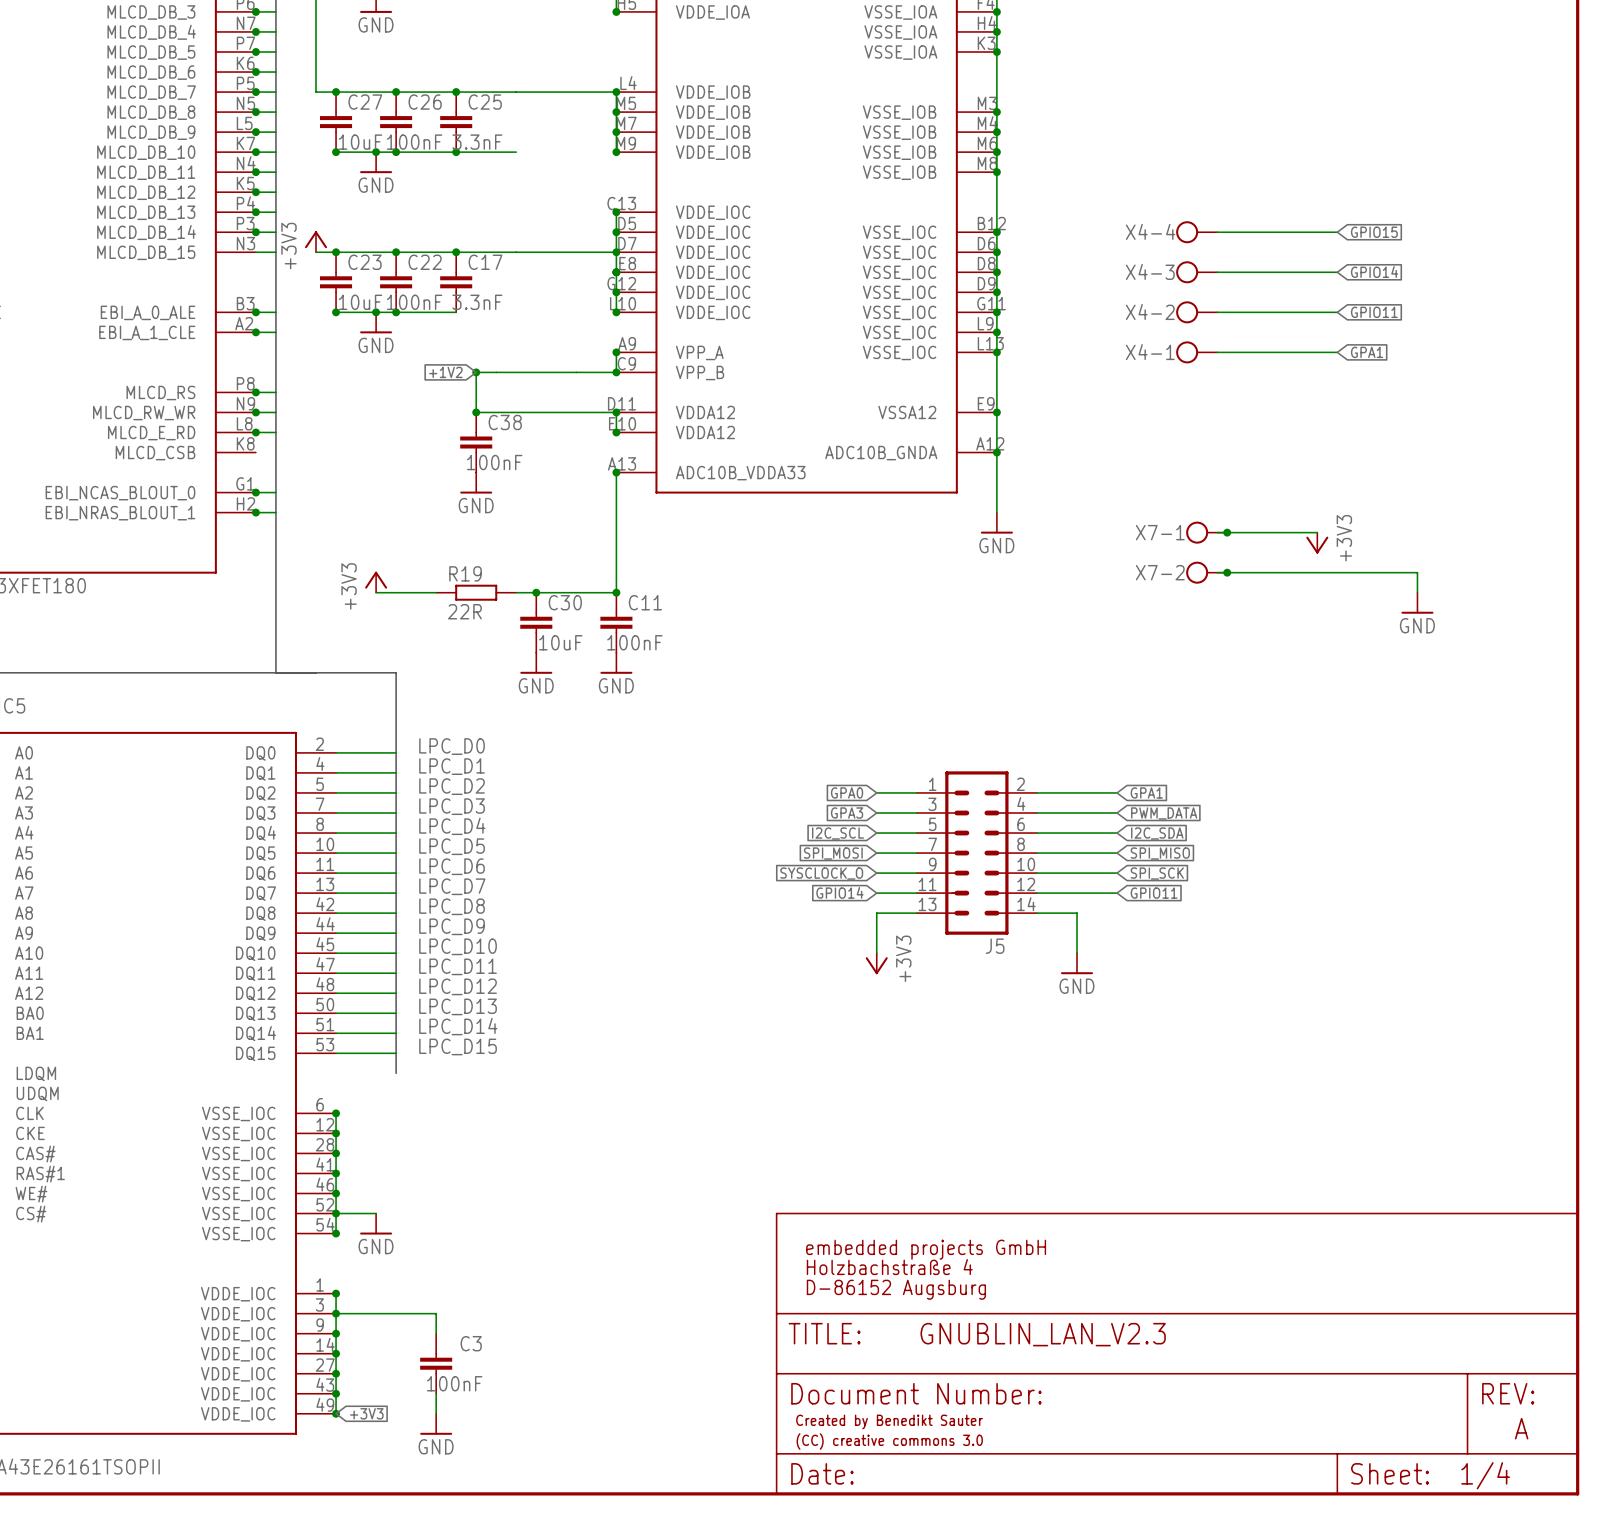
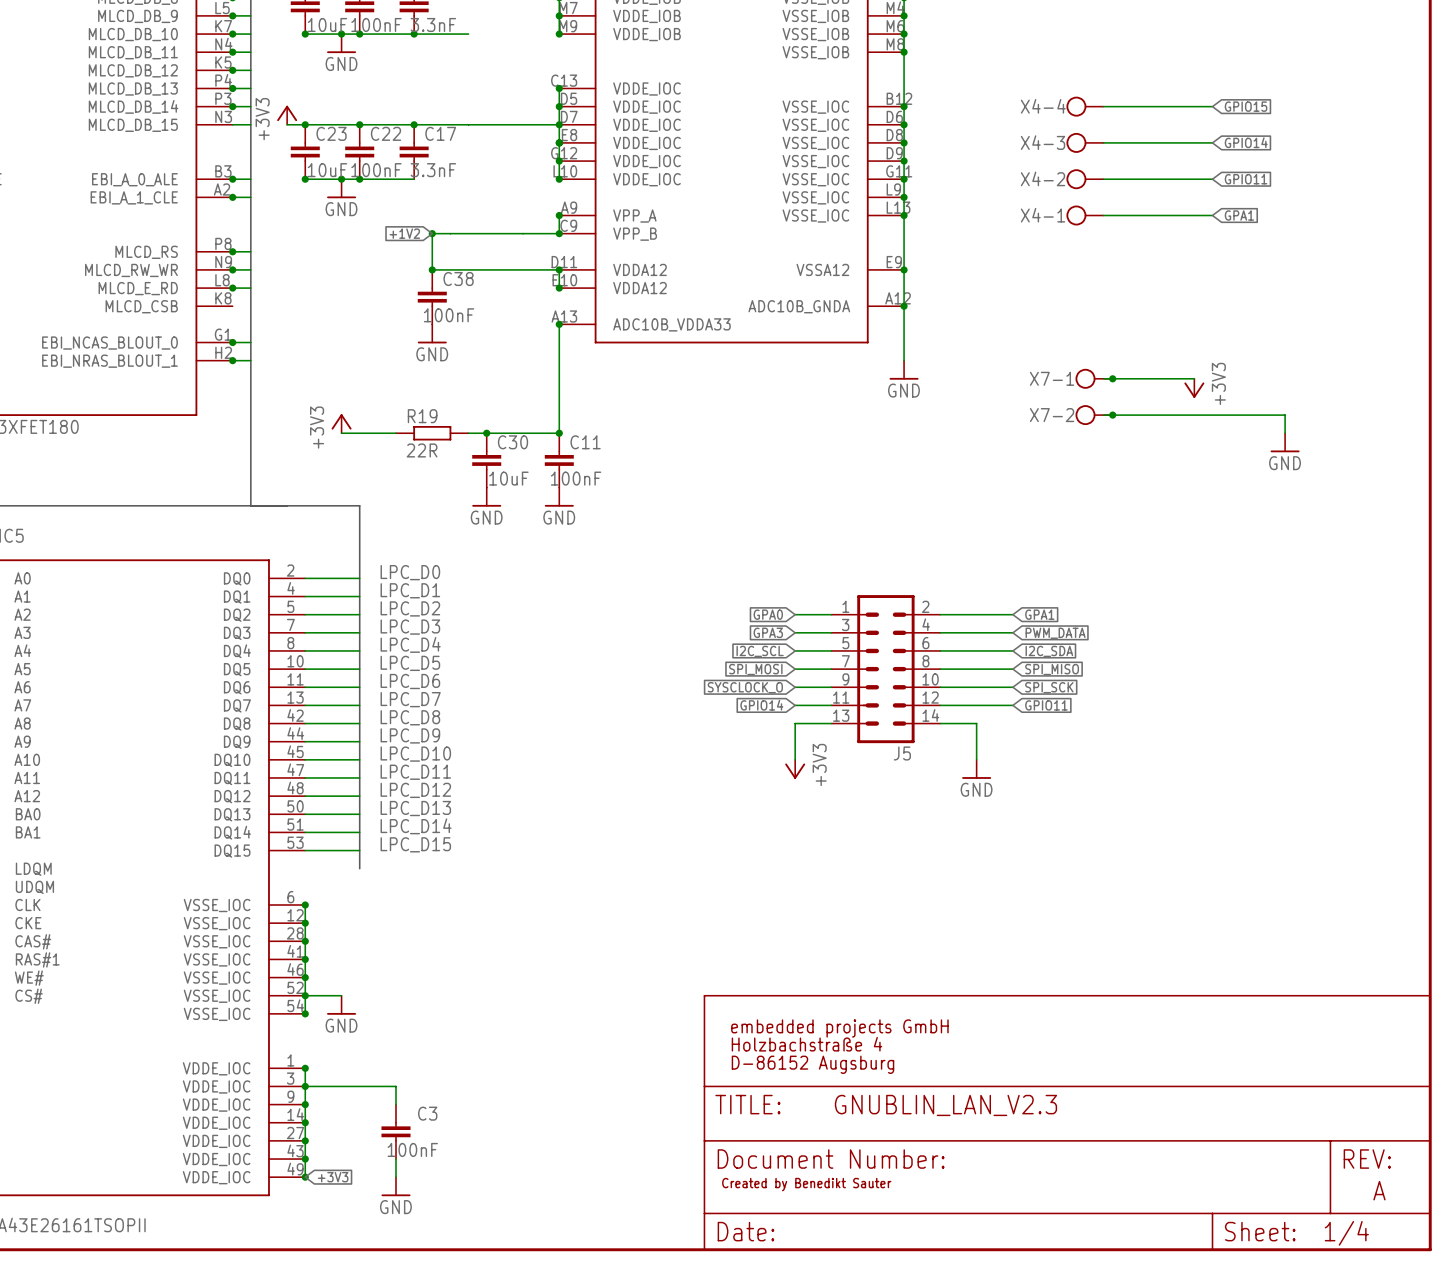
text: (CC) creative commons 3.0 (889, 1441) -> none

